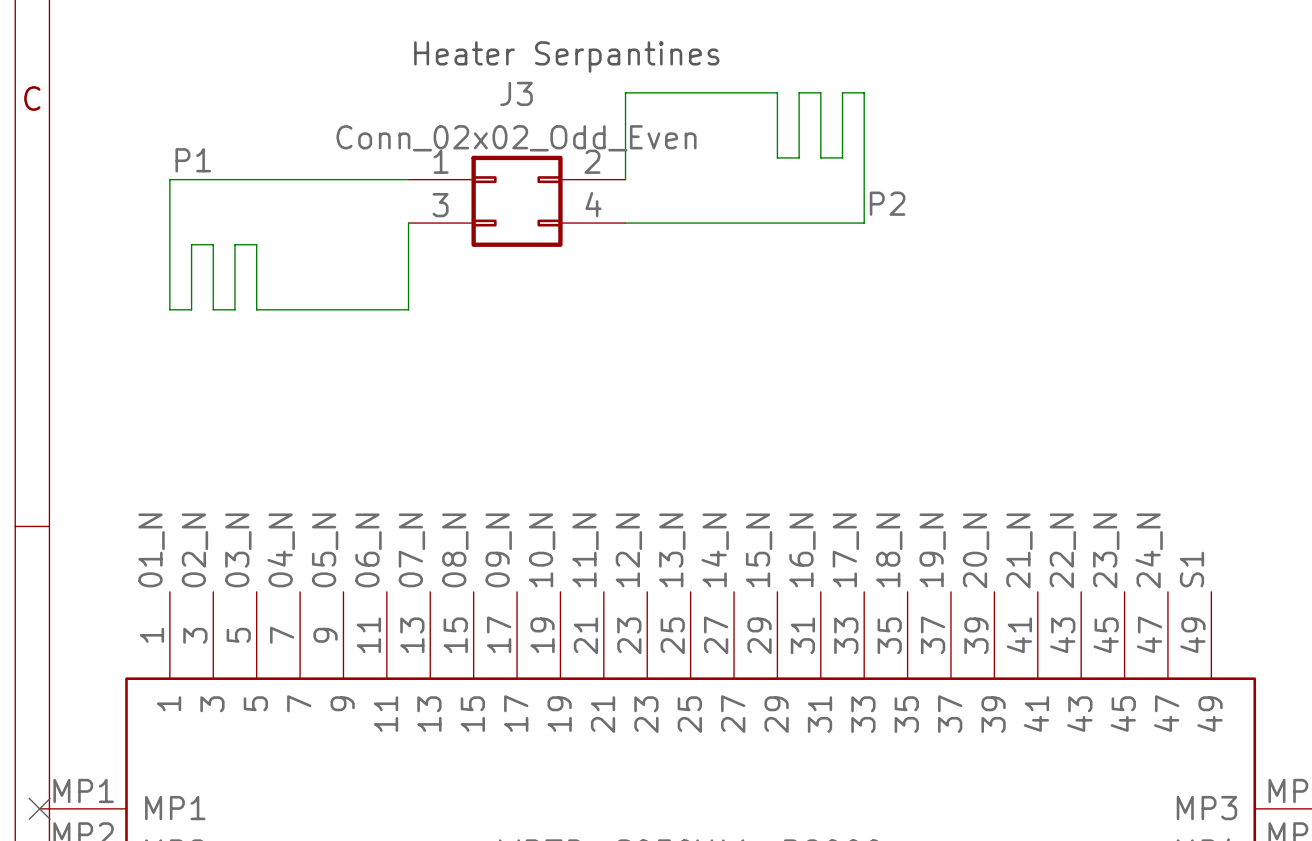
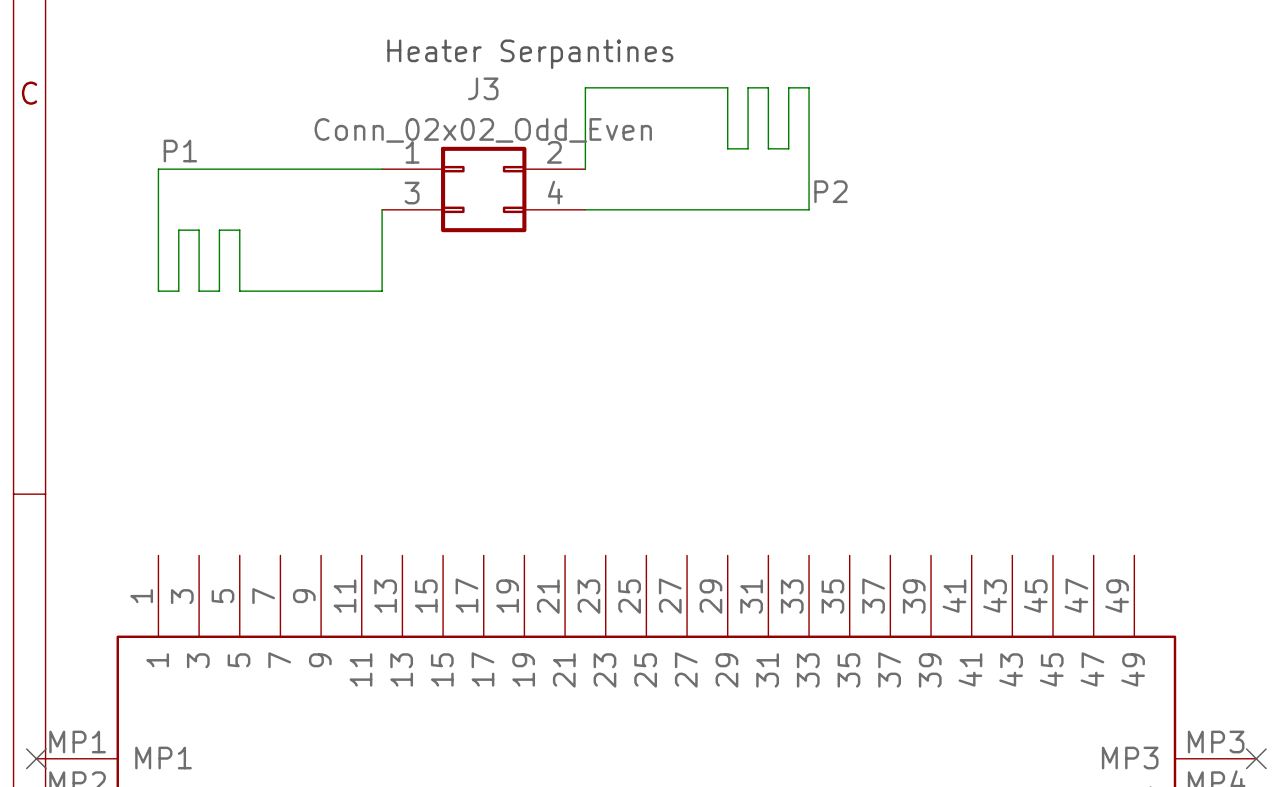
label: 01_N (151, 550) -> none
label: 02_N (194, 550) -> none
label: 03_N (238, 550) -> none
label: 04_N (281, 550) -> none
label: 05_N (325, 550) -> none
label: 06_N (368, 550) -> none
label: 07_N (411, 550) -> none
label: 08_N (455, 550) -> none
label: 09_N (498, 550) -> none
label: 10_N (542, 550) -> none
label: 11_N (585, 550) -> none
label: 12_N (628, 550) -> none
label: 13_N (672, 550) -> none
label: 14_N (715, 550) -> none
label: 15_N (759, 550) -> none
label: 16_N (802, 550) -> none
label: 17_N (845, 550) -> none
label: 18_N (889, 550) -> none
label: 19_N (932, 550) -> none
label: 20_N (976, 550) -> none
label: 21_N (1019, 550) -> none
label: 22_N (1062, 550) -> none
label: 23_N (1106, 550) -> none
label: 24_N (1149, 550) -> none
label: S1 (1191, 569) -> none

